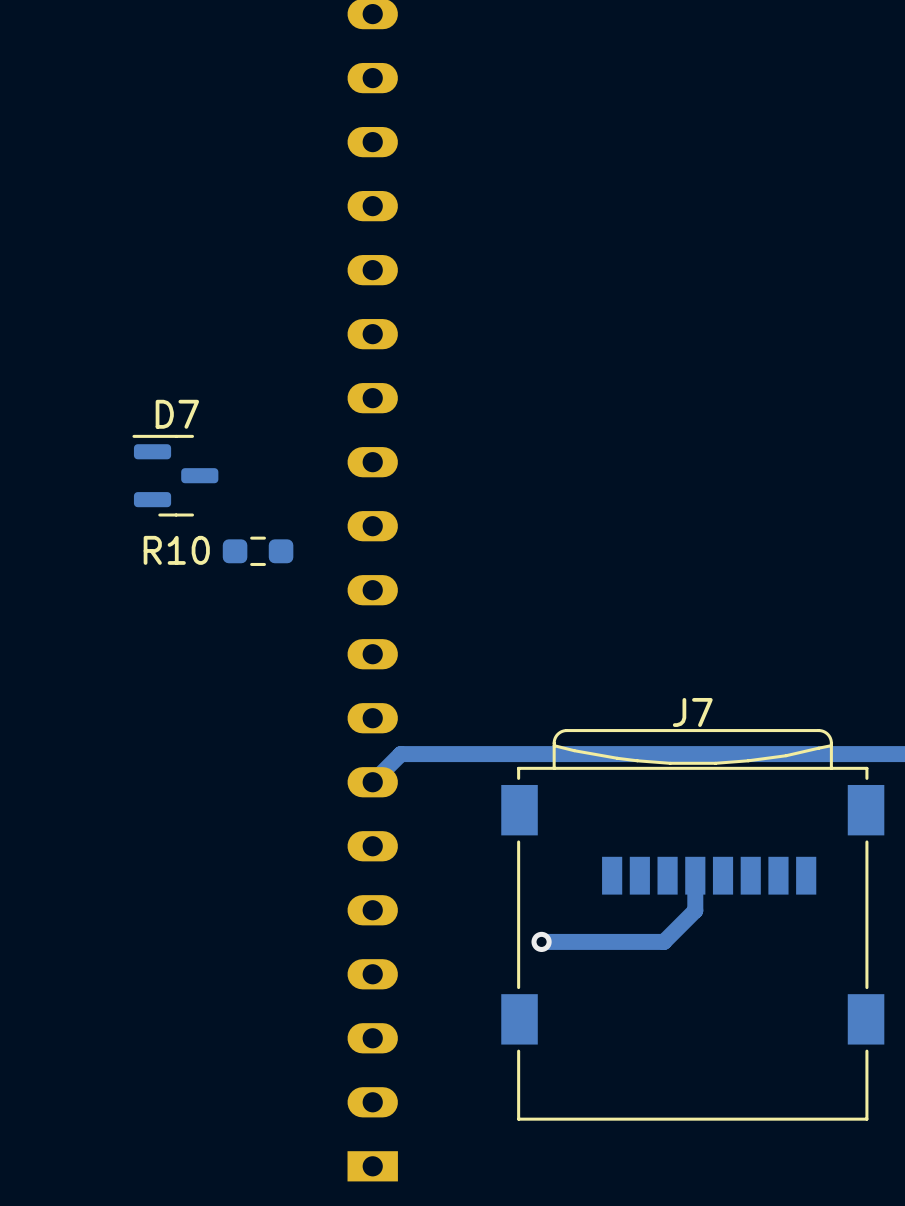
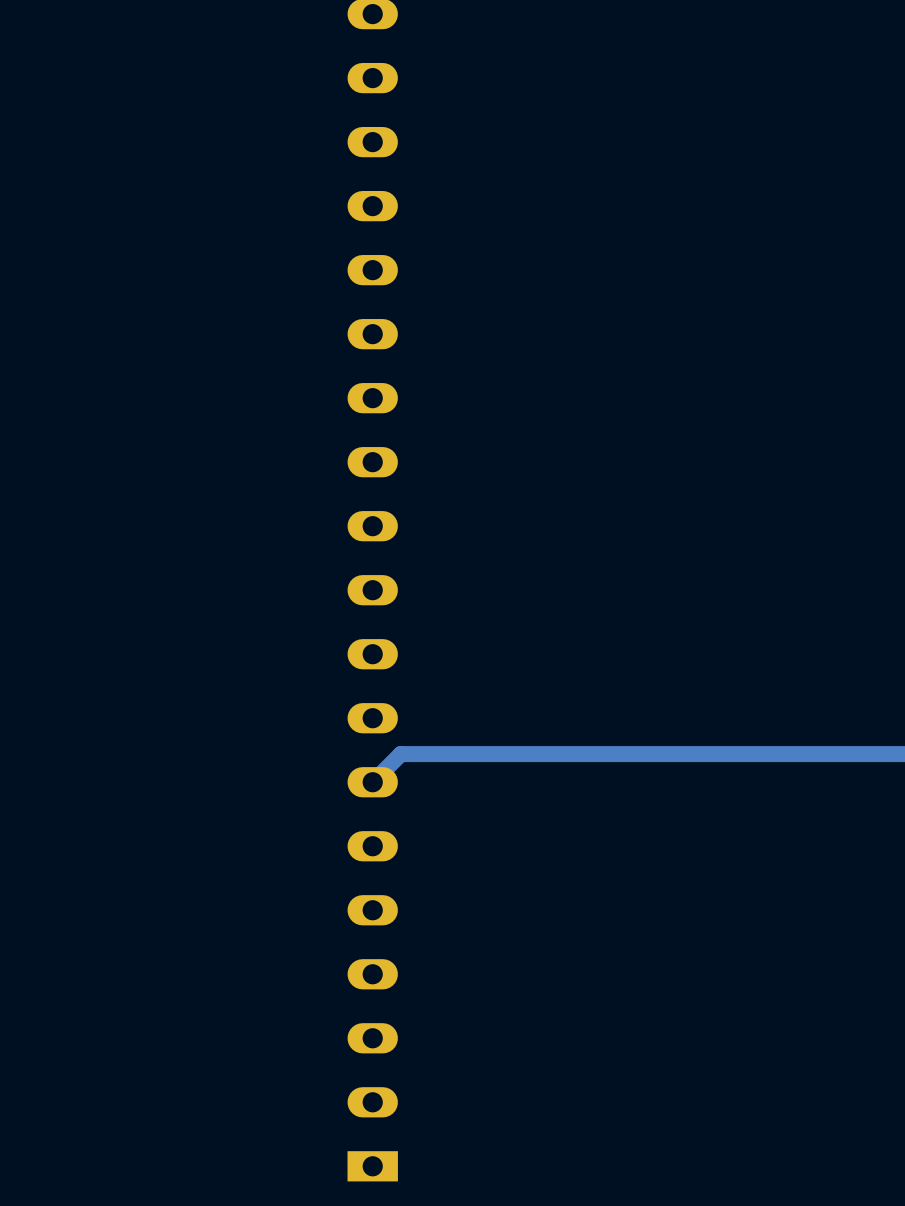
D7: (175, 475) -> none
R10: (258, 551) -> none
track: (695, 875) (695, 910) (663, 941) (541, 941) -> none
J7: (692, 924) -> none
via: (541, 941) -> none

